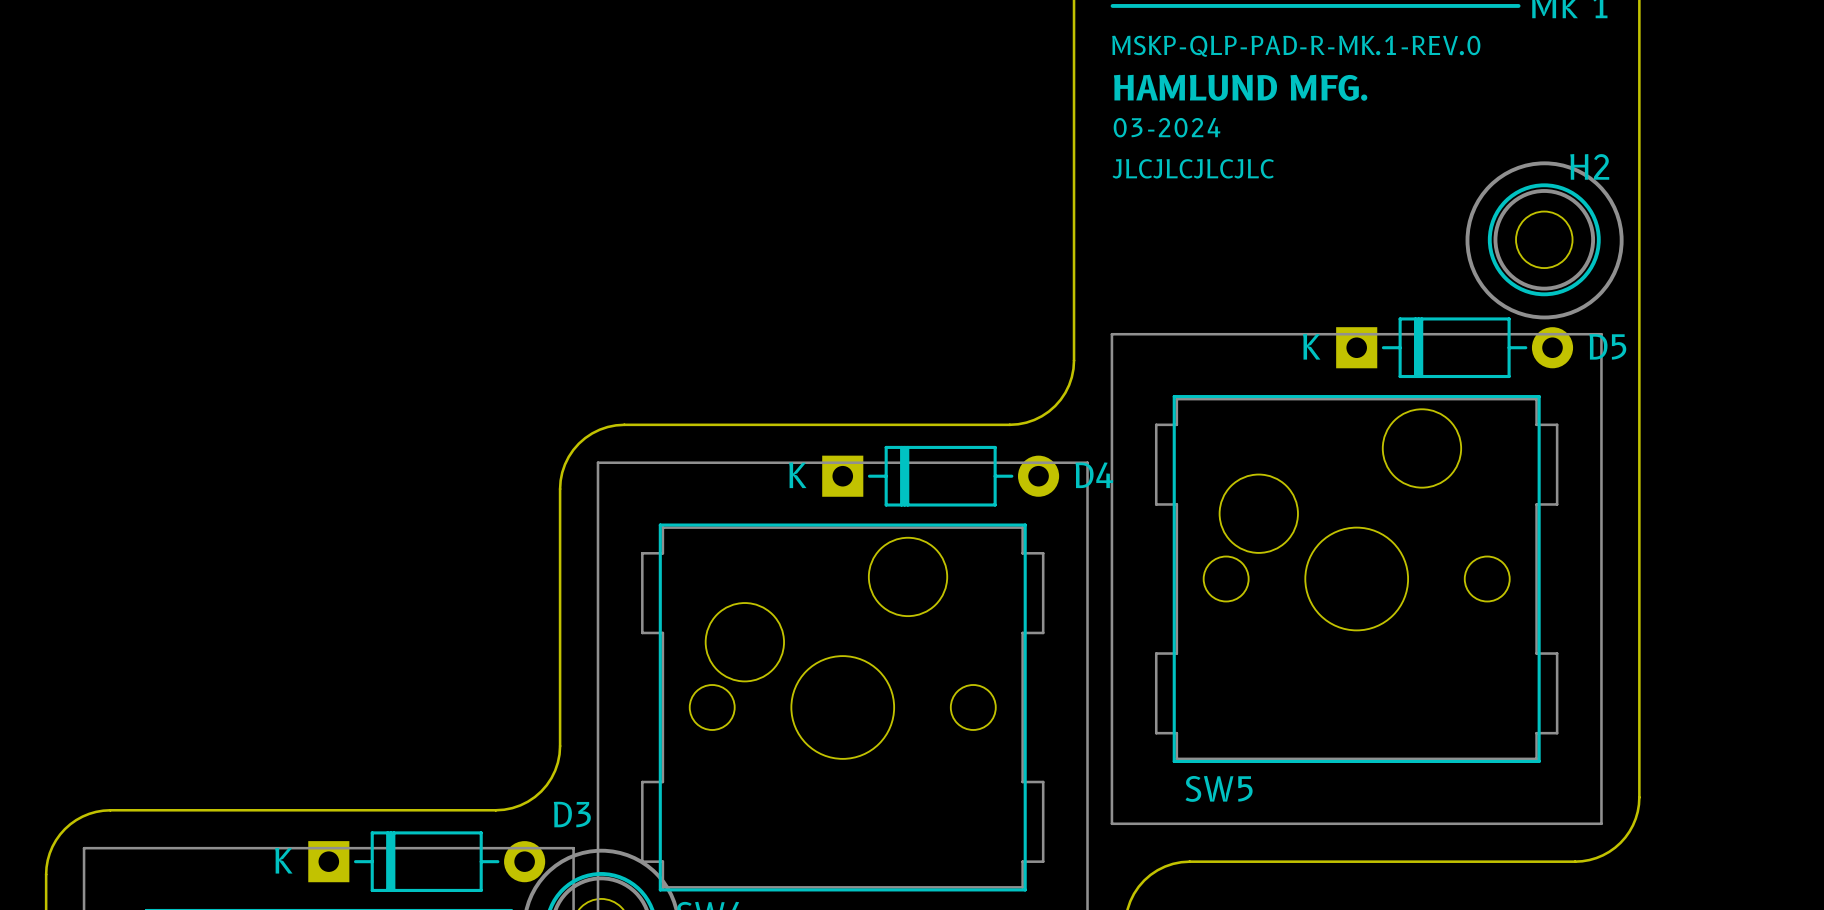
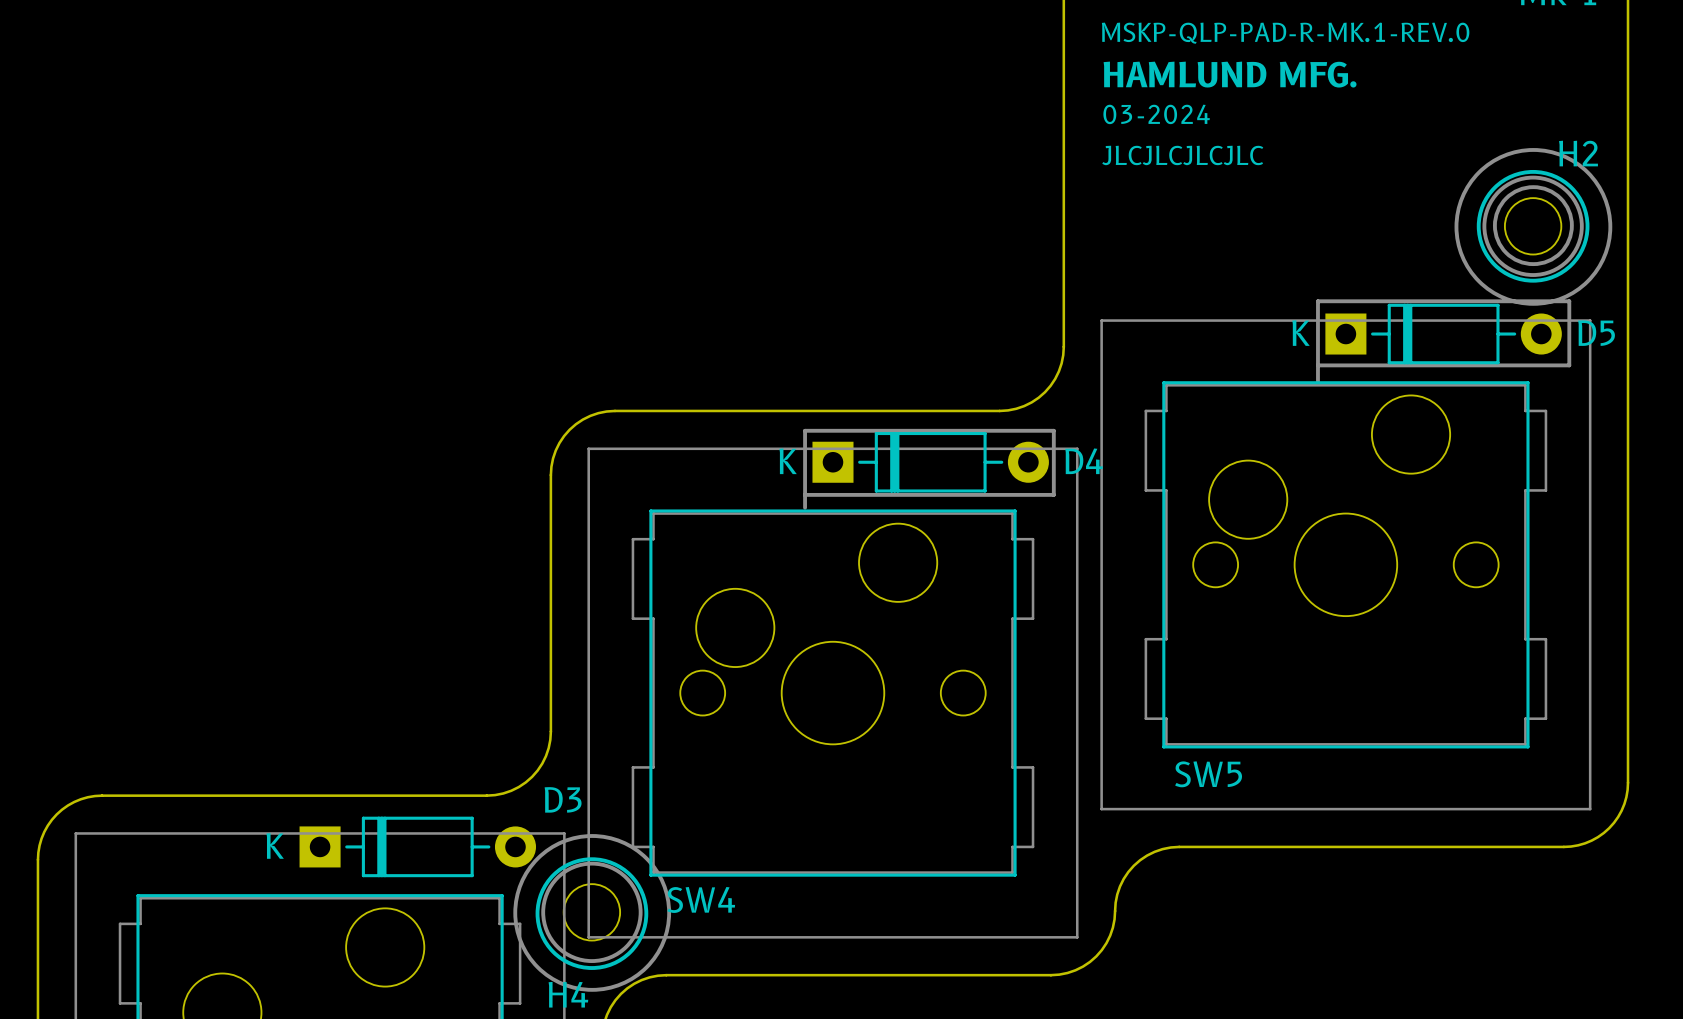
drawing: none -> [1492, 185, 1574, 267]
line: none -> (1317, 365) (1569, 365) (1569, 301) (1317, 301) (1317, 382)
line: none -> (805, 494) (1053, 494) (1053, 430) (805, 430) (805, 507)

